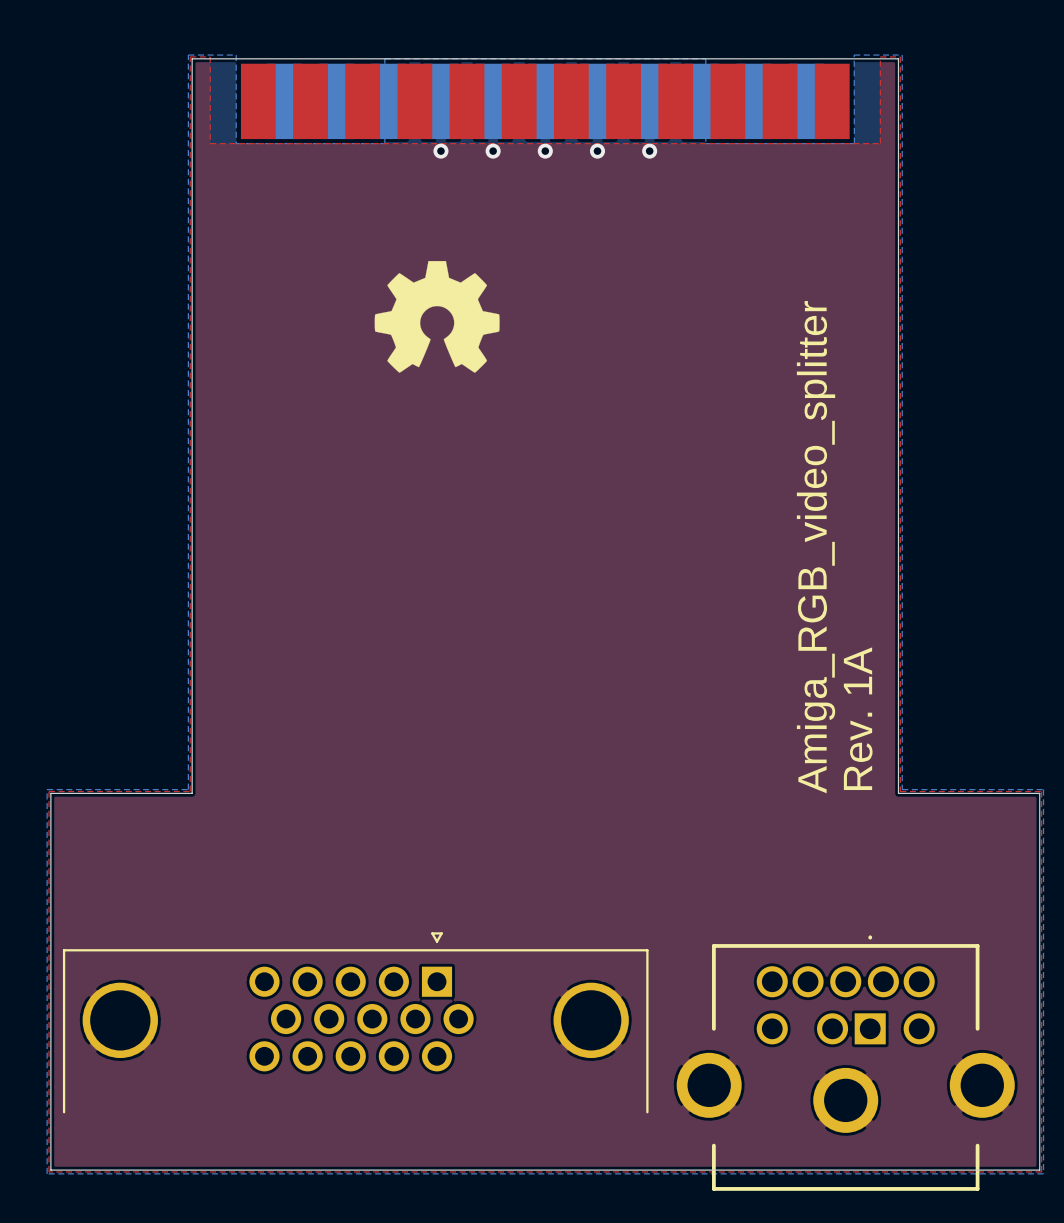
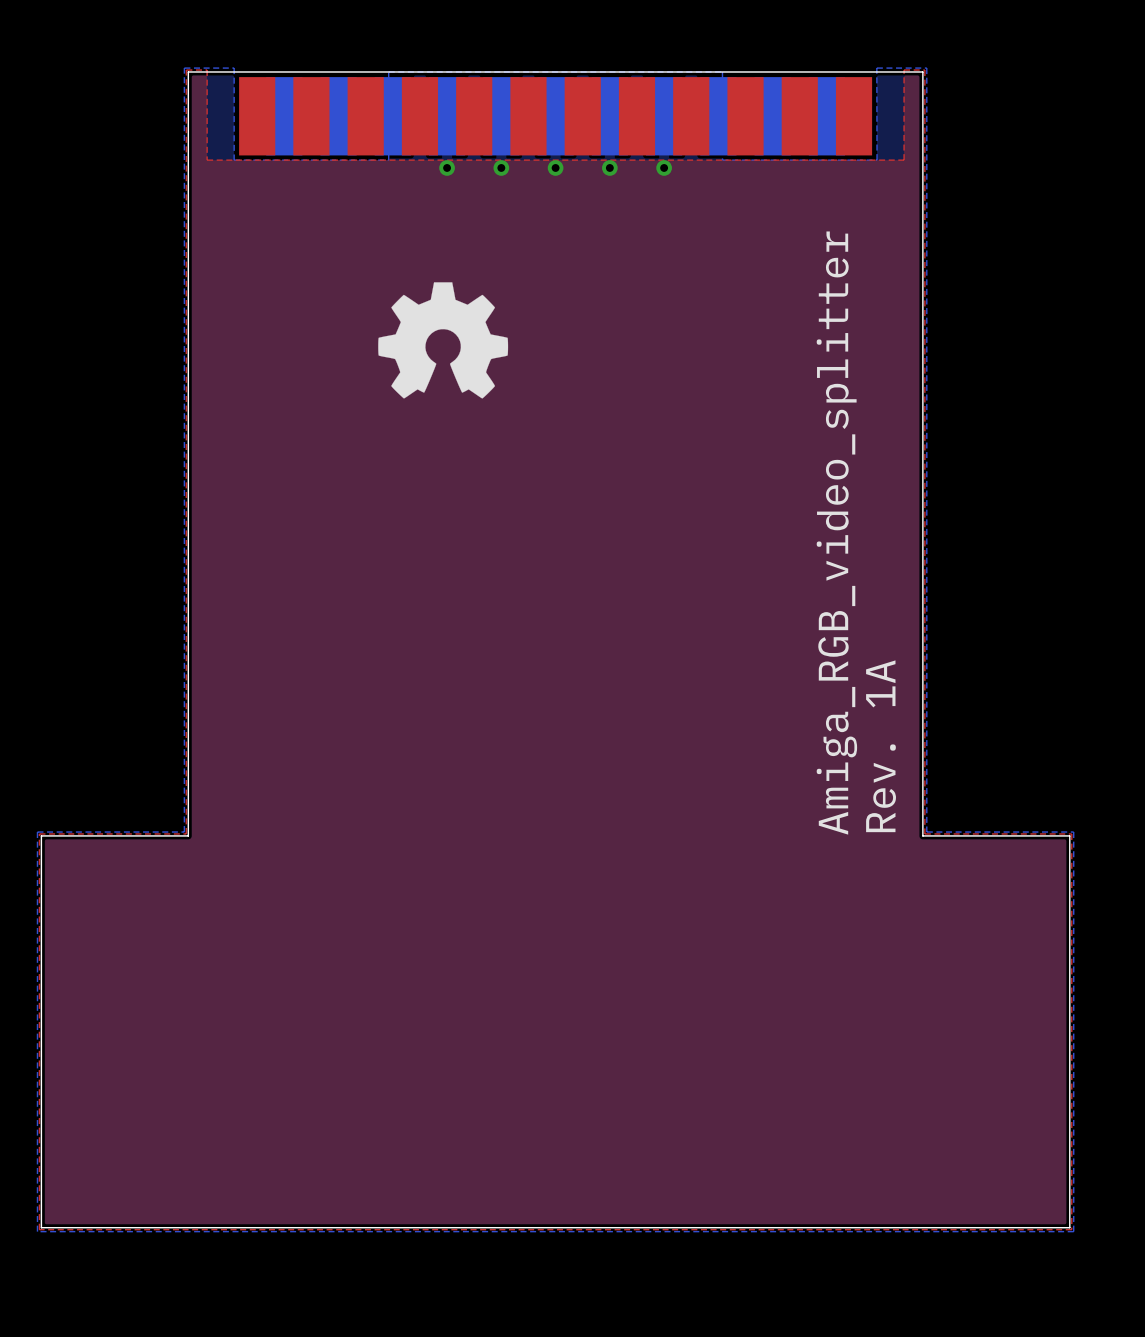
part: (355, 1022) -> none
part: (845, 1063) -> none

